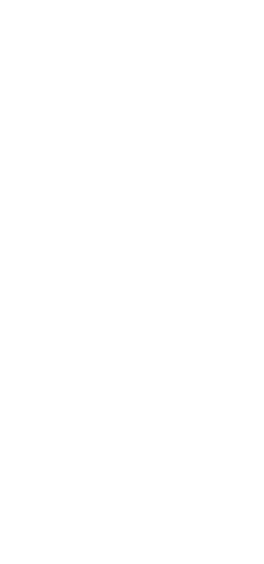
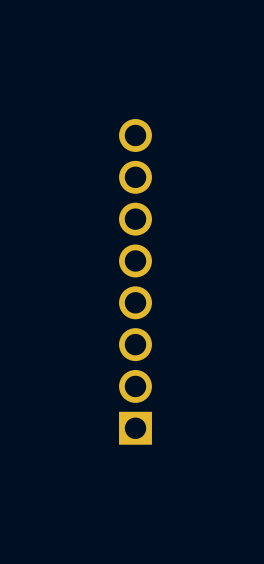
part: none -> (135, 281)

